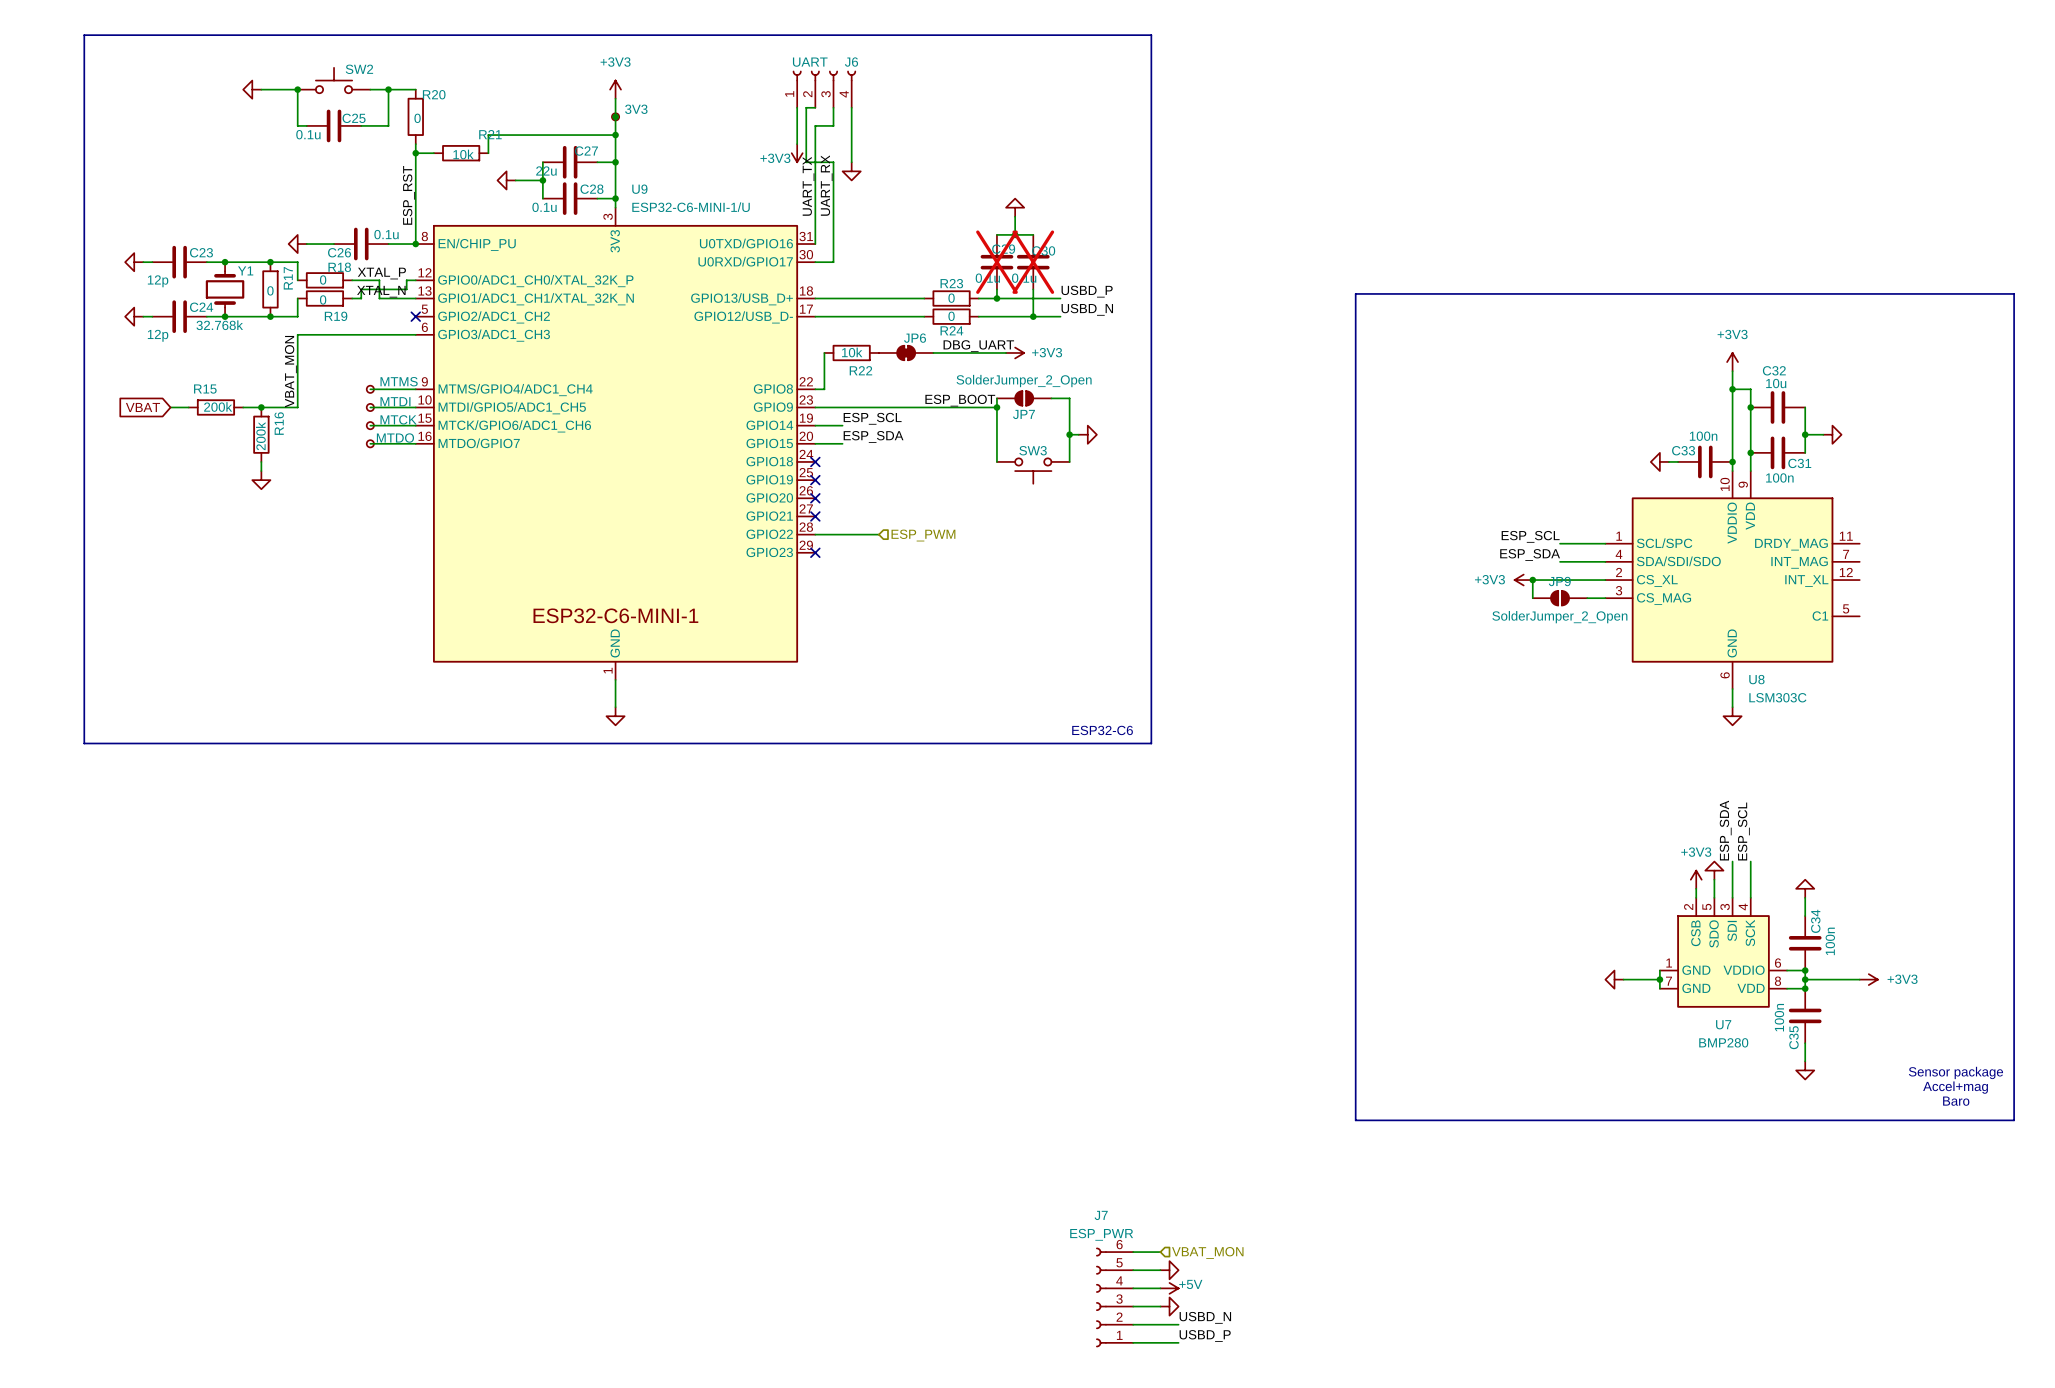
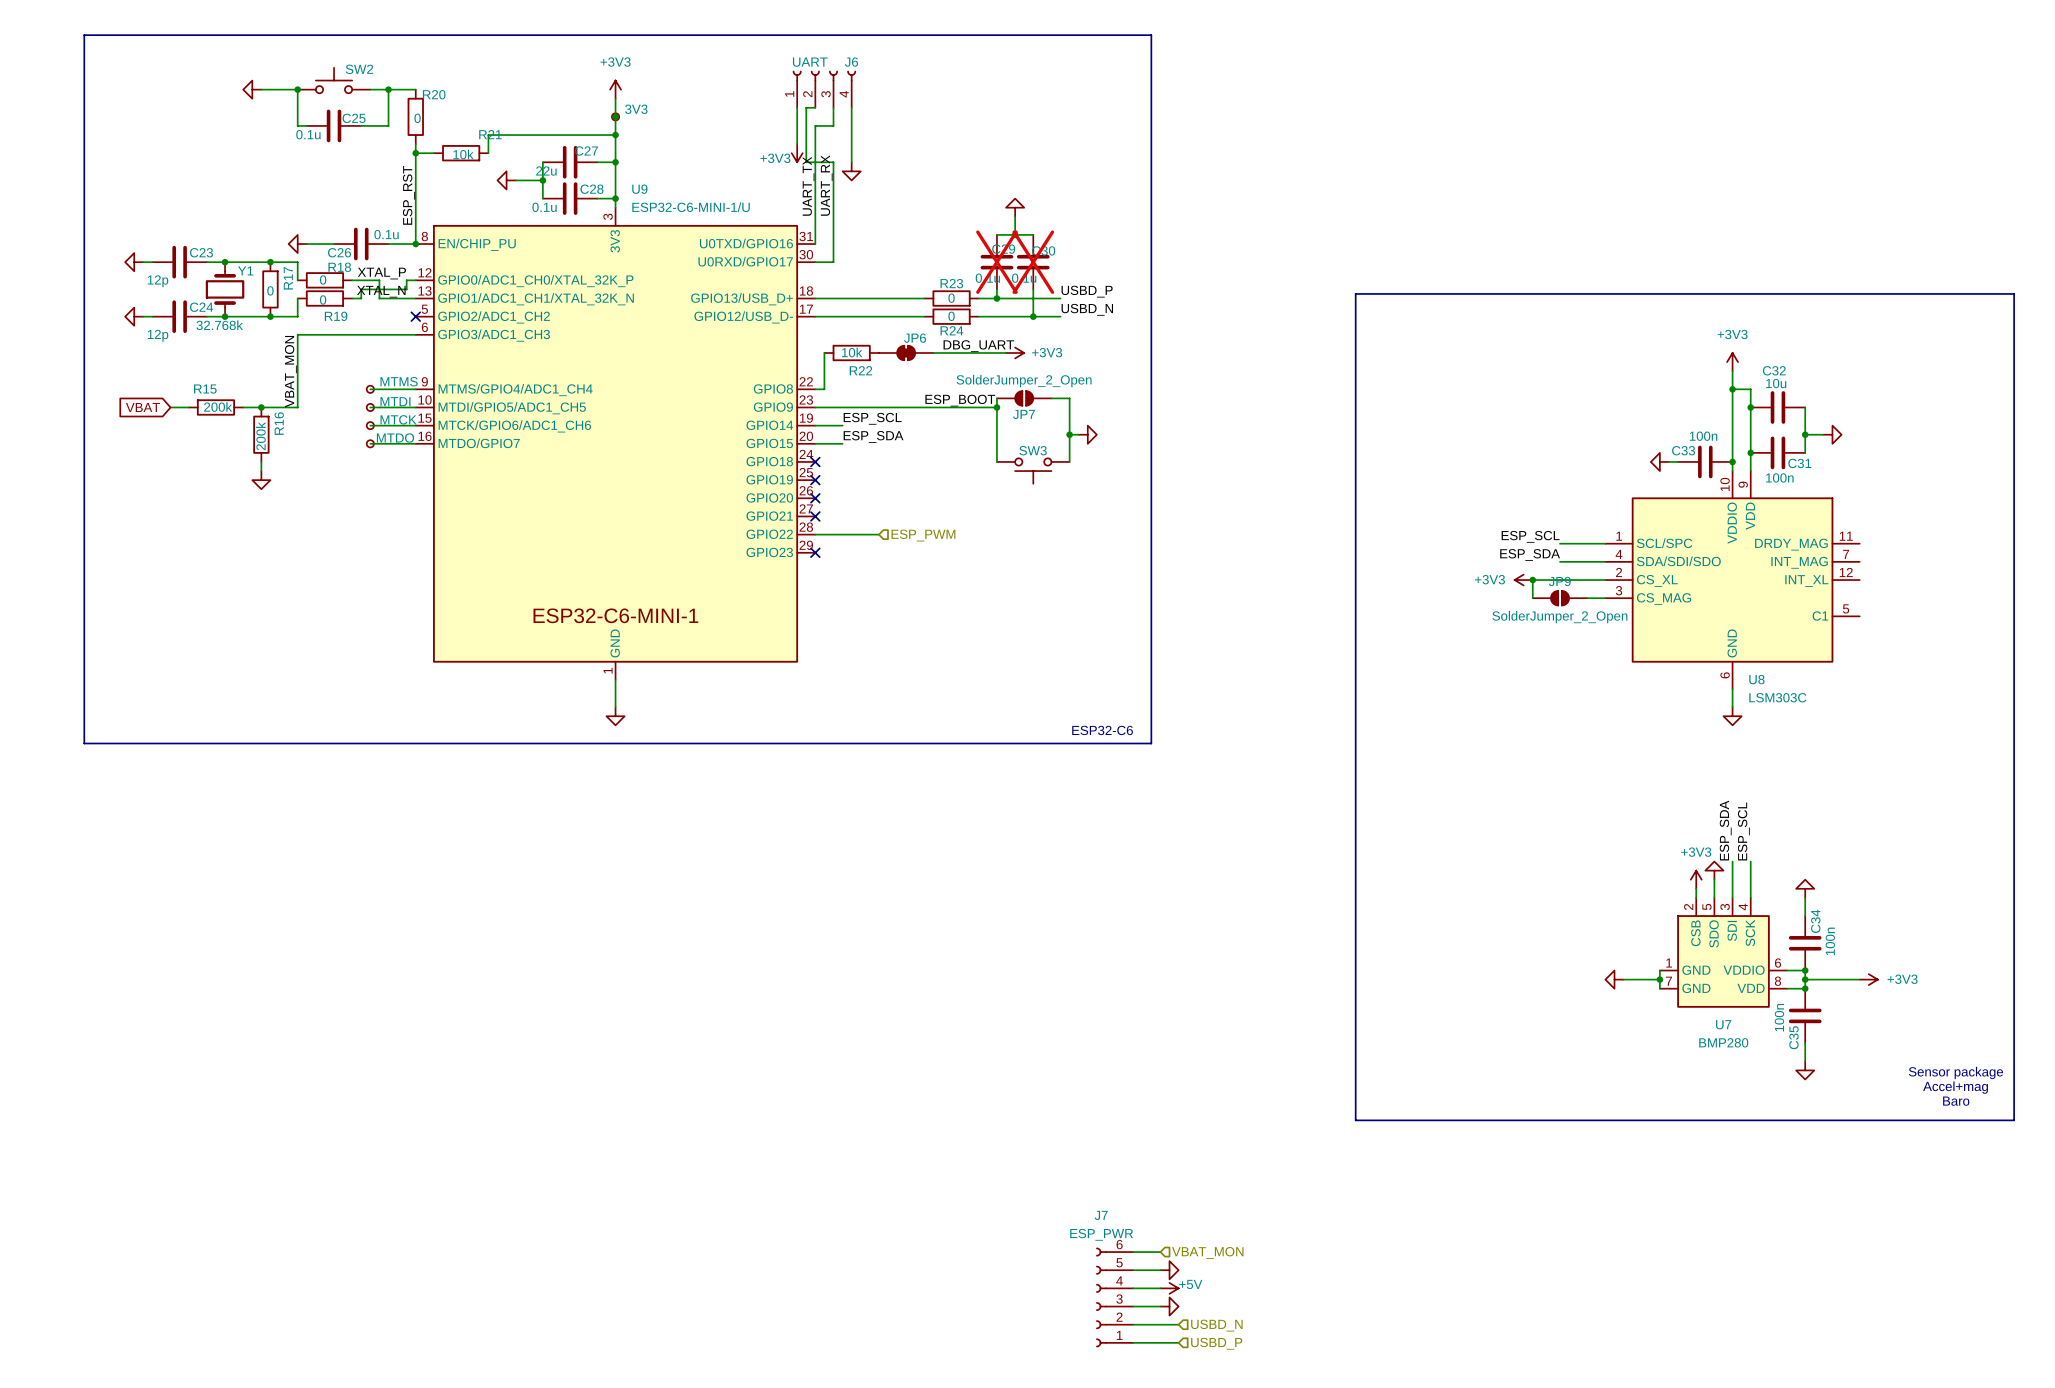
label: USBD_N (1205, 1317) -> none
hierarchical label: none -> USBD_N (1216, 1325)
label: USBD_P (1205, 1336) -> none
hierarchical label: none -> USBD_P (1216, 1343)

